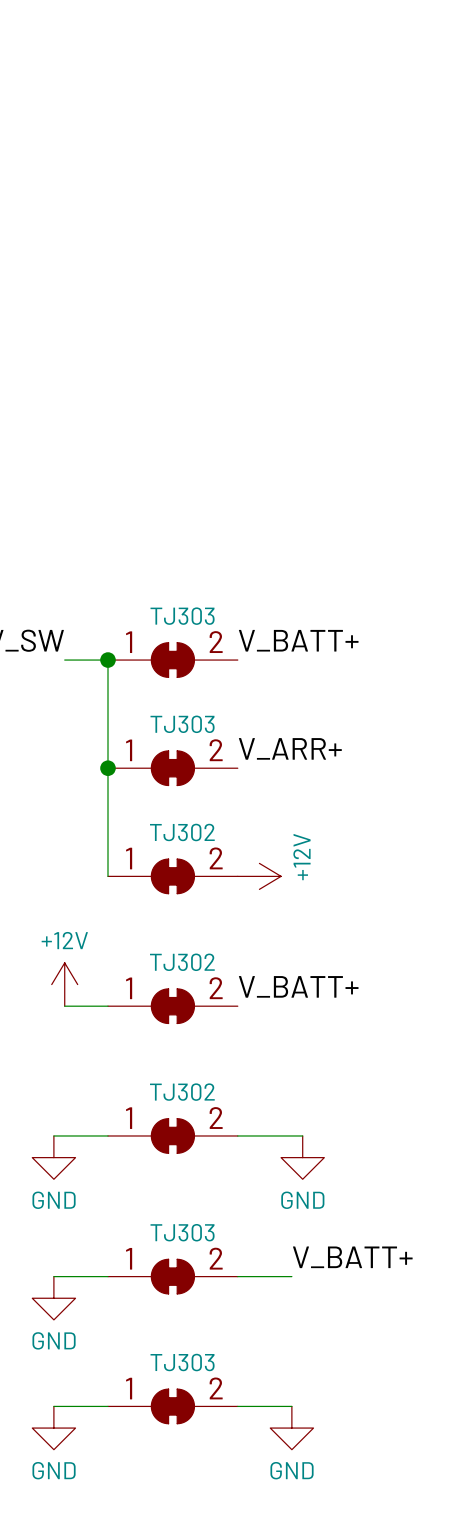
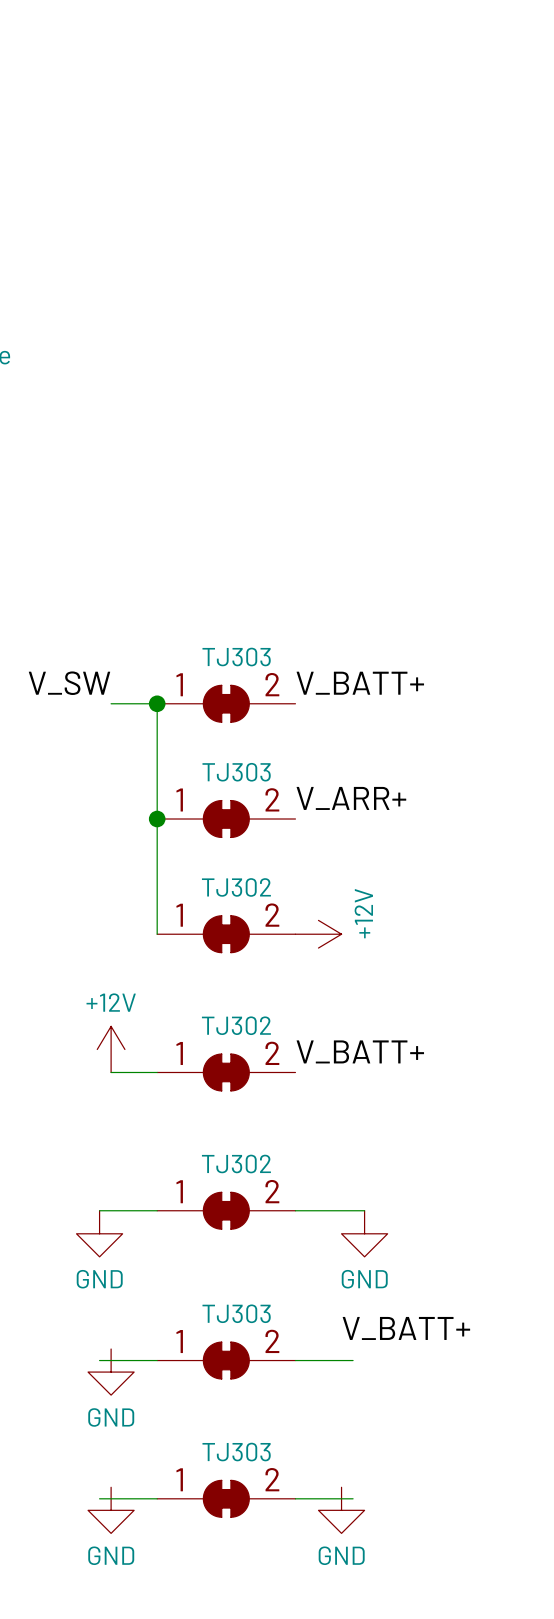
label position: V_BATT+ (352, 1257) -> V_BATT+ (406, 1328)
power symbol position: GND (53, 1298) -> GND (111, 1372)
power symbol position: GND (53, 1428) -> GND (111, 1510)
power symbol position: GND (291, 1428) -> GND (341, 1510)

